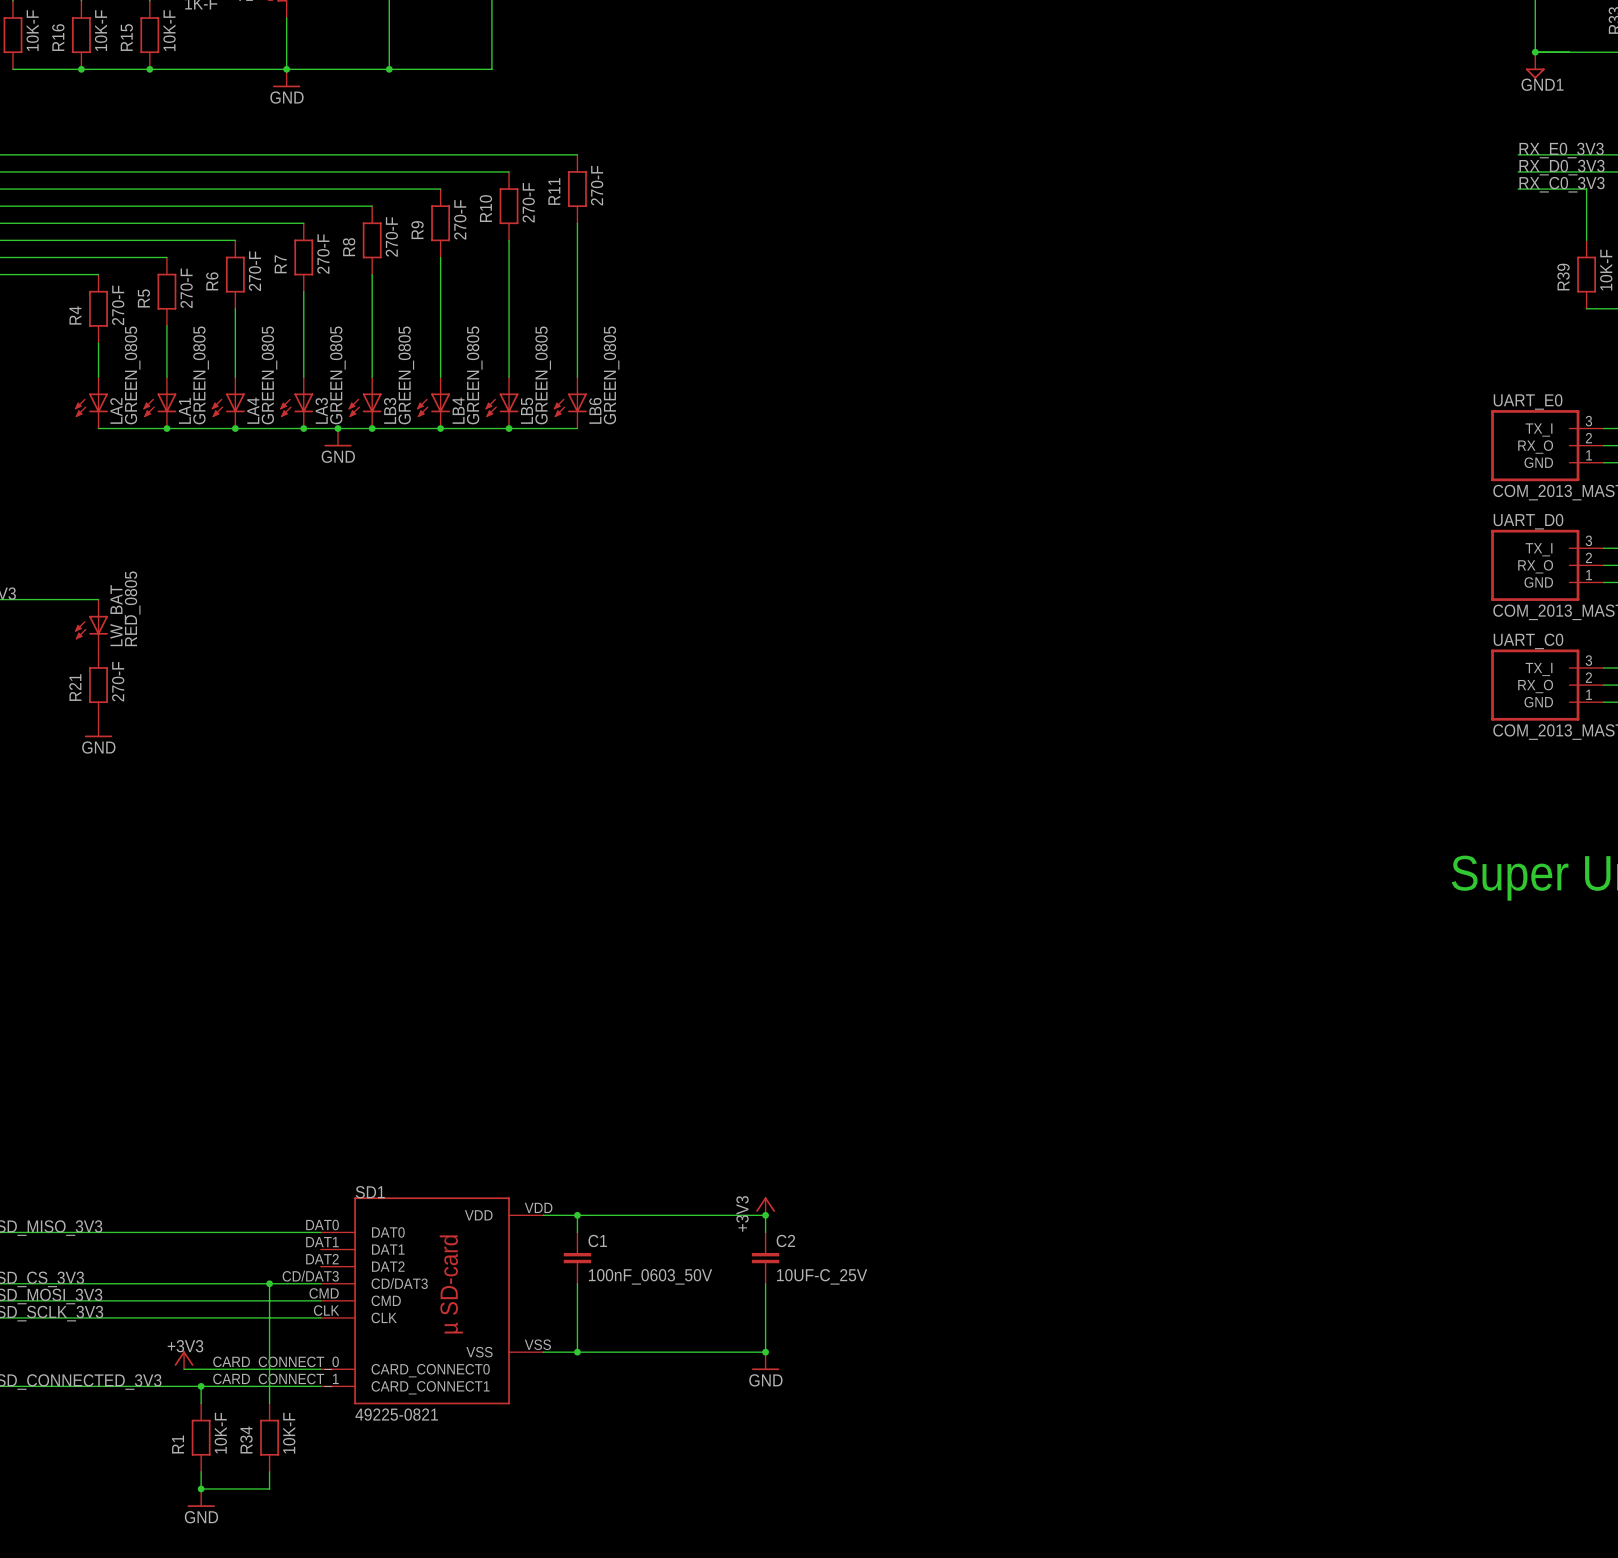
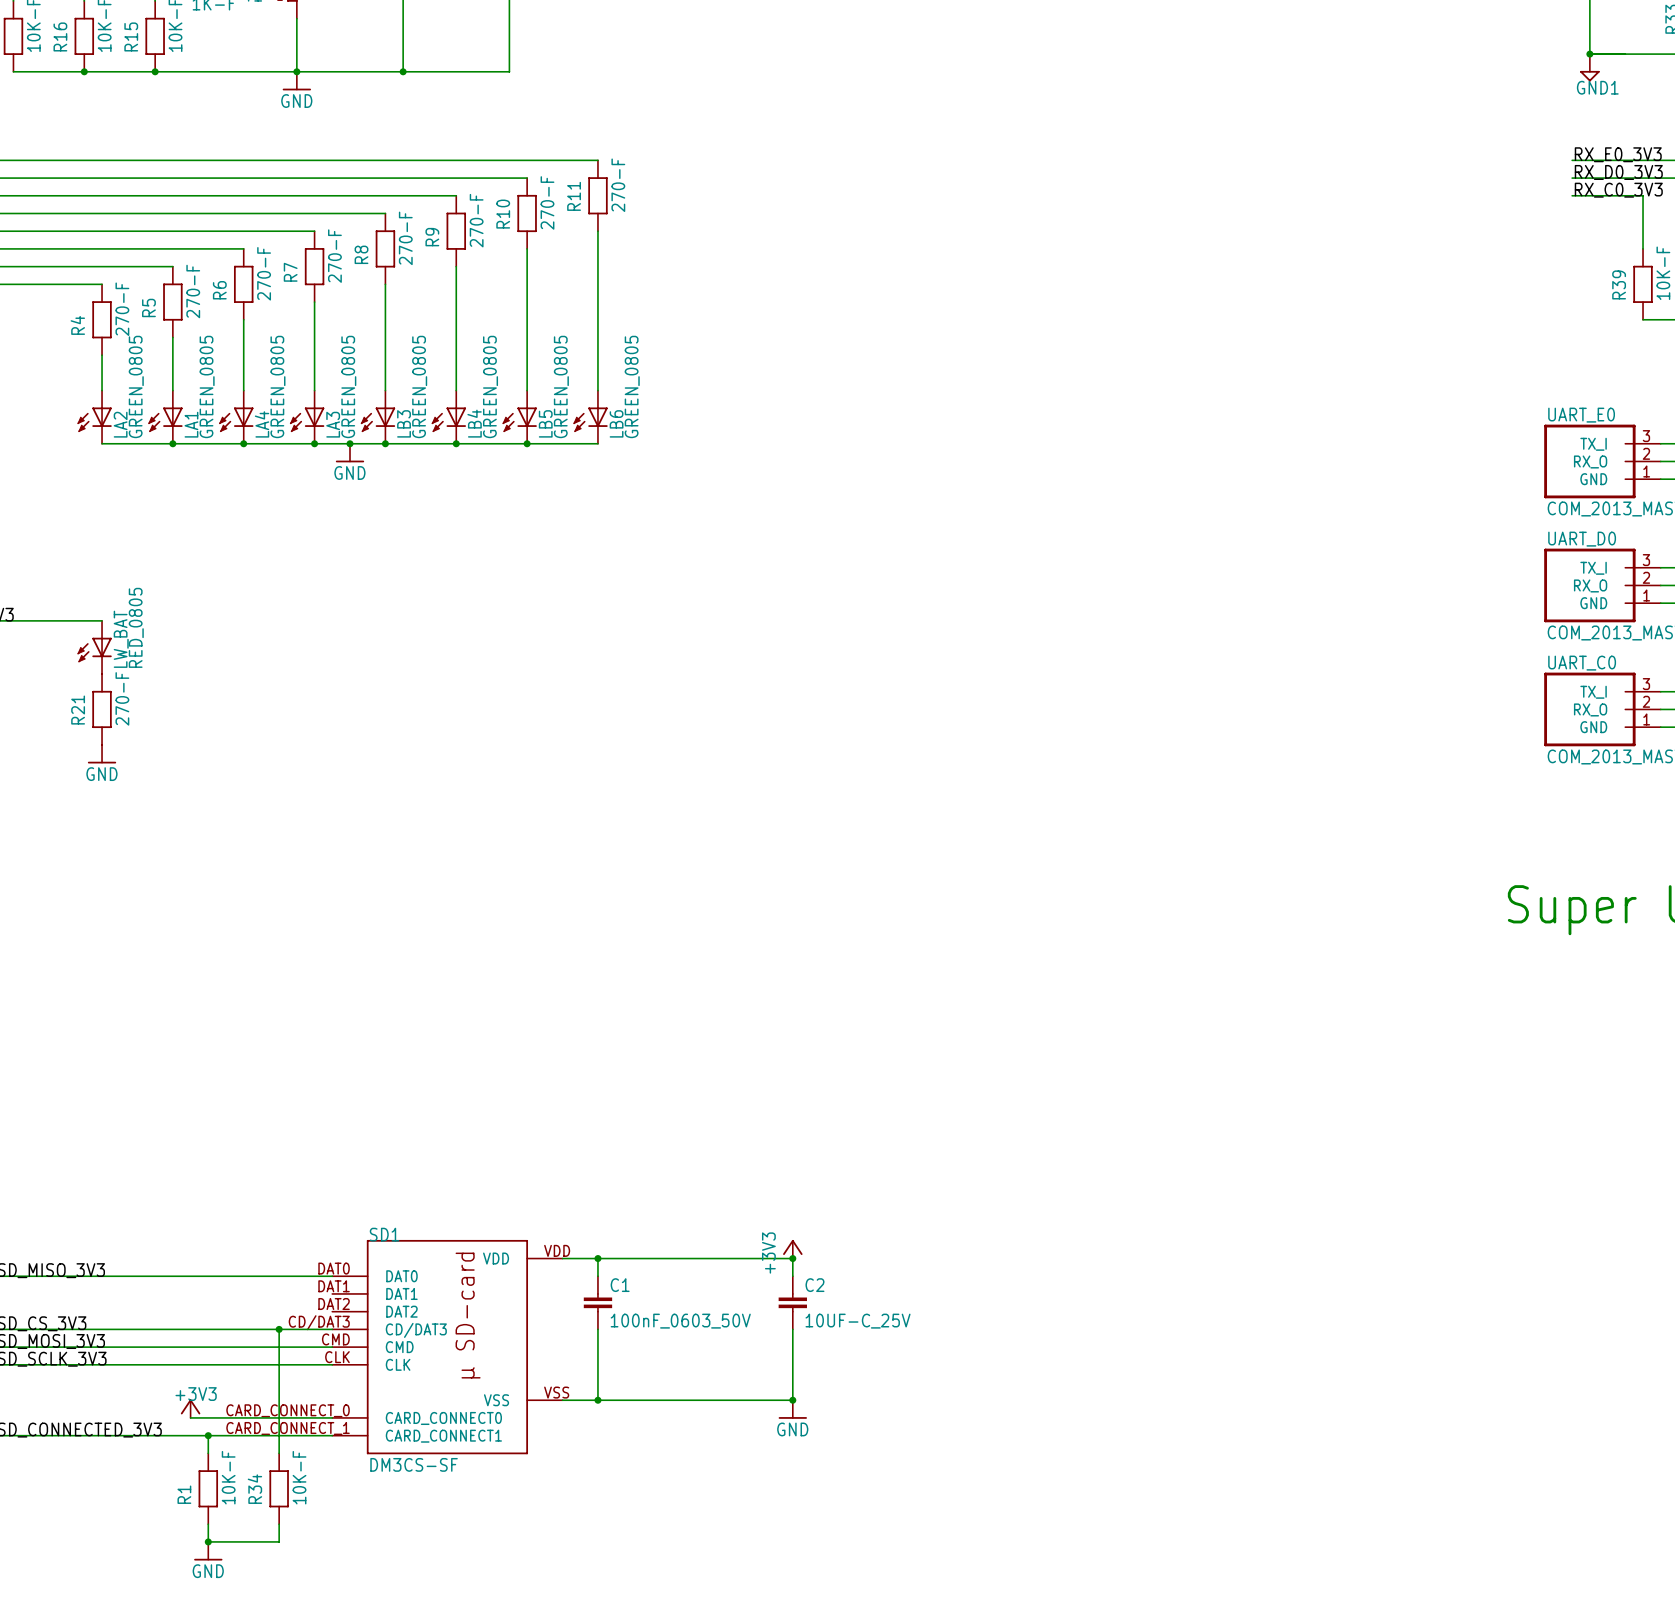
SD1 value: 49225-0821 (396, 1414) -> DM3CS-SF (414, 1464)

